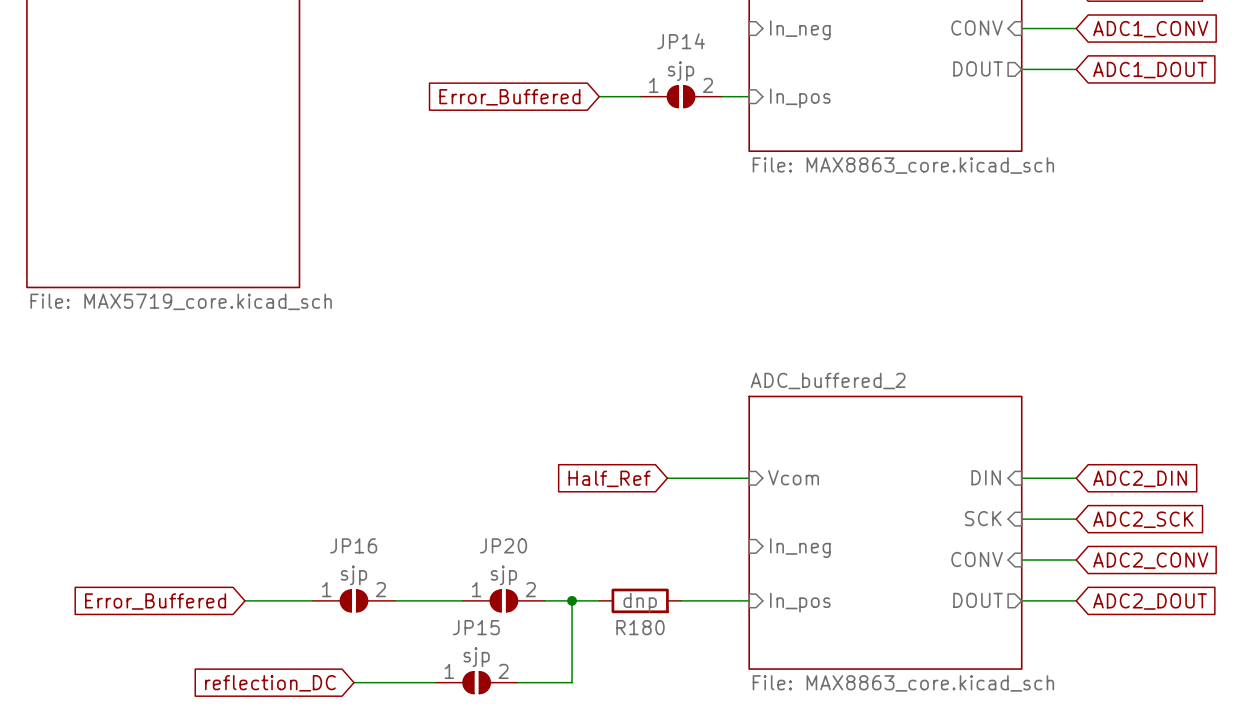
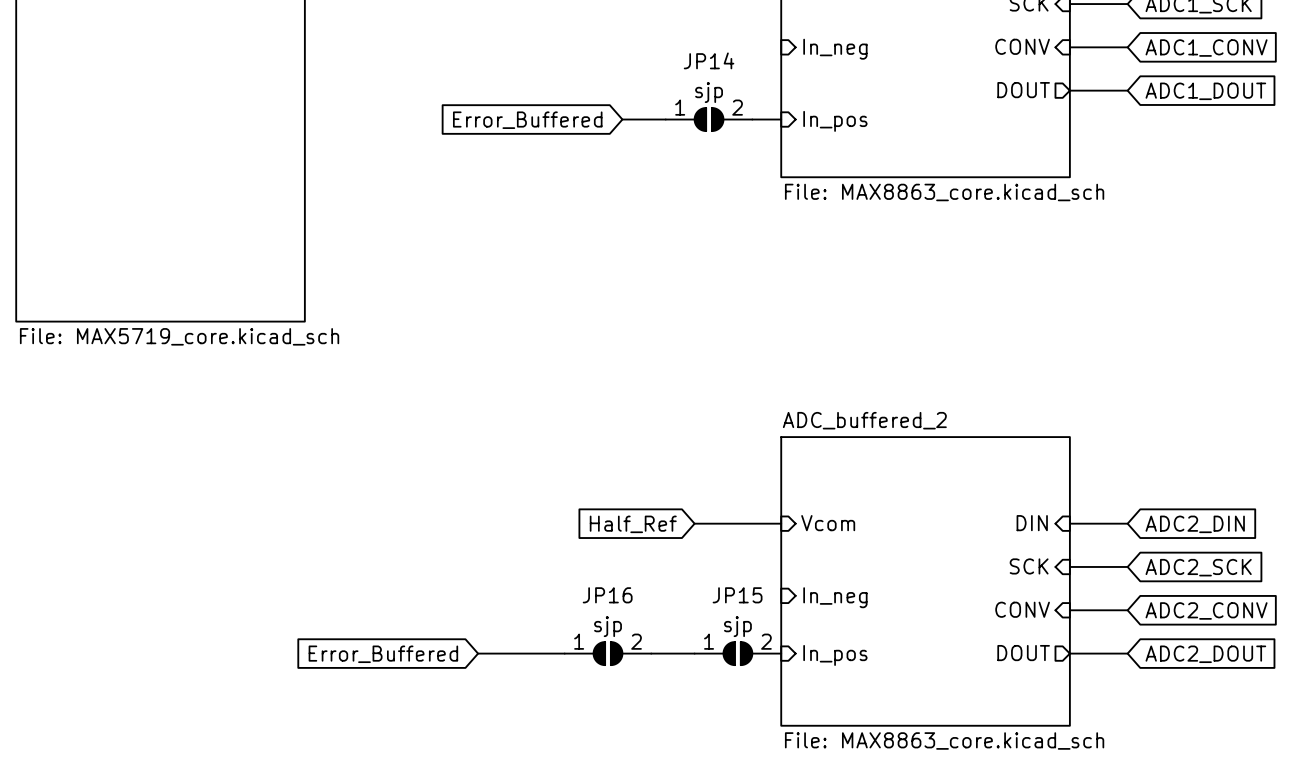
wire: (244, 600) (313, 600) -> none
JP16 position: (353, 600) -> (608, 653)
wire: (394, 600) (463, 600) -> none
JP20: sjp (503, 600) -> none
wire: (572, 600) (572, 682) (517, 682) -> none
junction: (572, 600) -> none
wire: none -> (651, 653) (694, 653)
R180: dnp (640, 600) -> none
global label position: Error_Buffered (155, 601) -> Error_Buffered (383, 654)
wire: (353, 682) (435, 682) -> none
JP15 position: (476, 682) -> (737, 653)
global label: reflection_DC (270, 683) -> none

